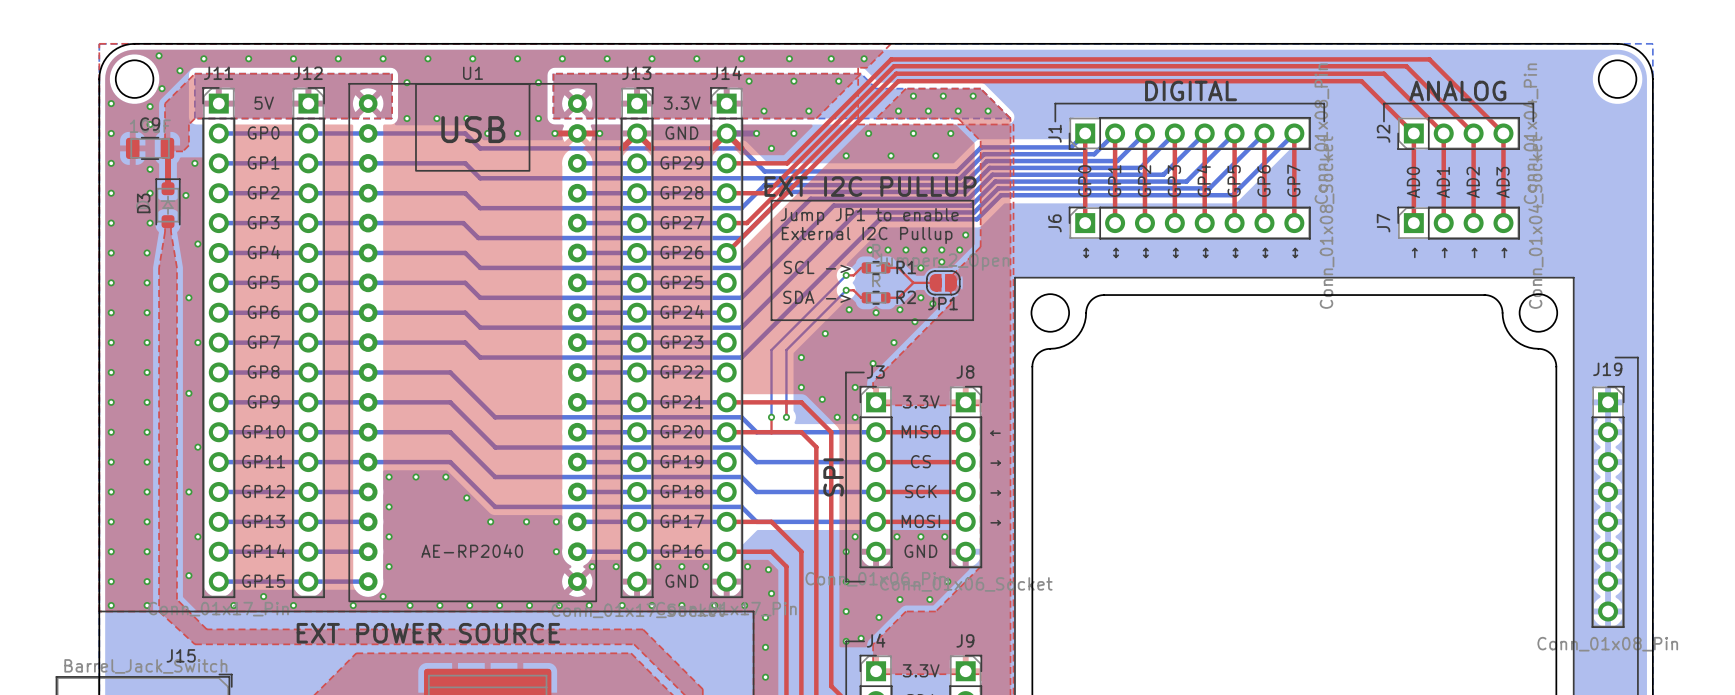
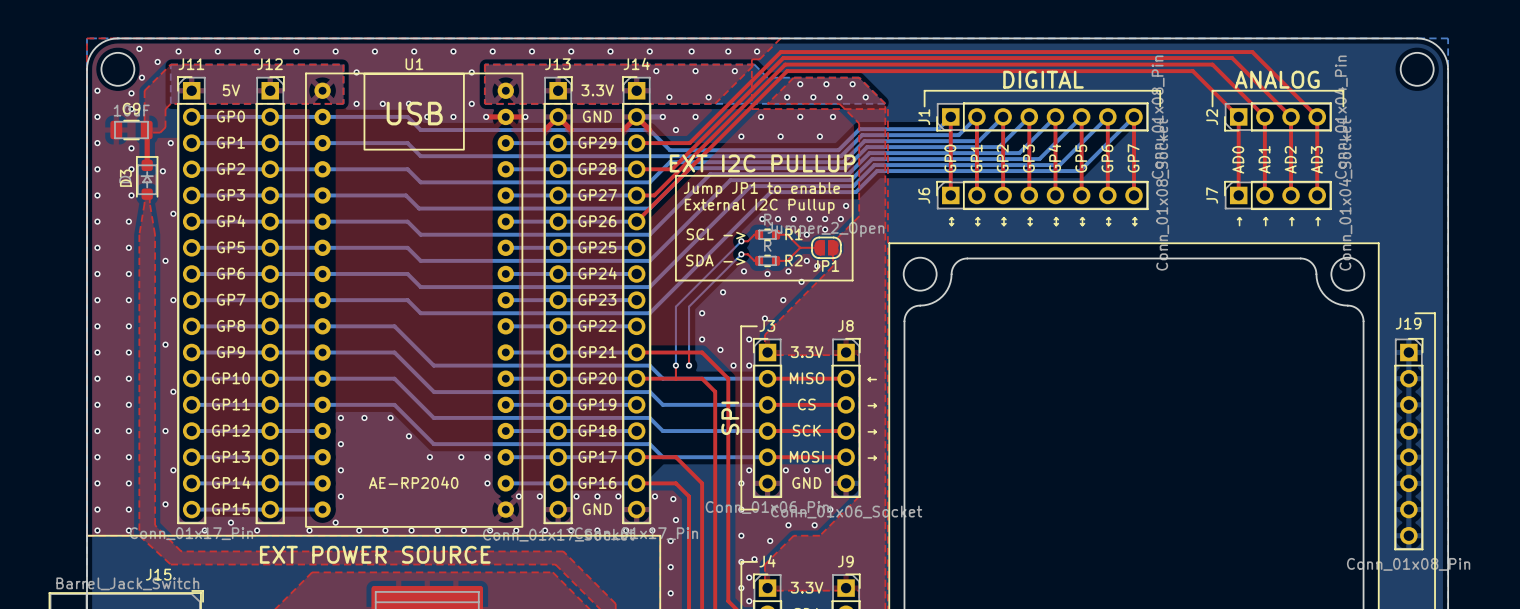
via: none -> (749, 577)
via: none -> (741, 588)
via: none -> (749, 601)

